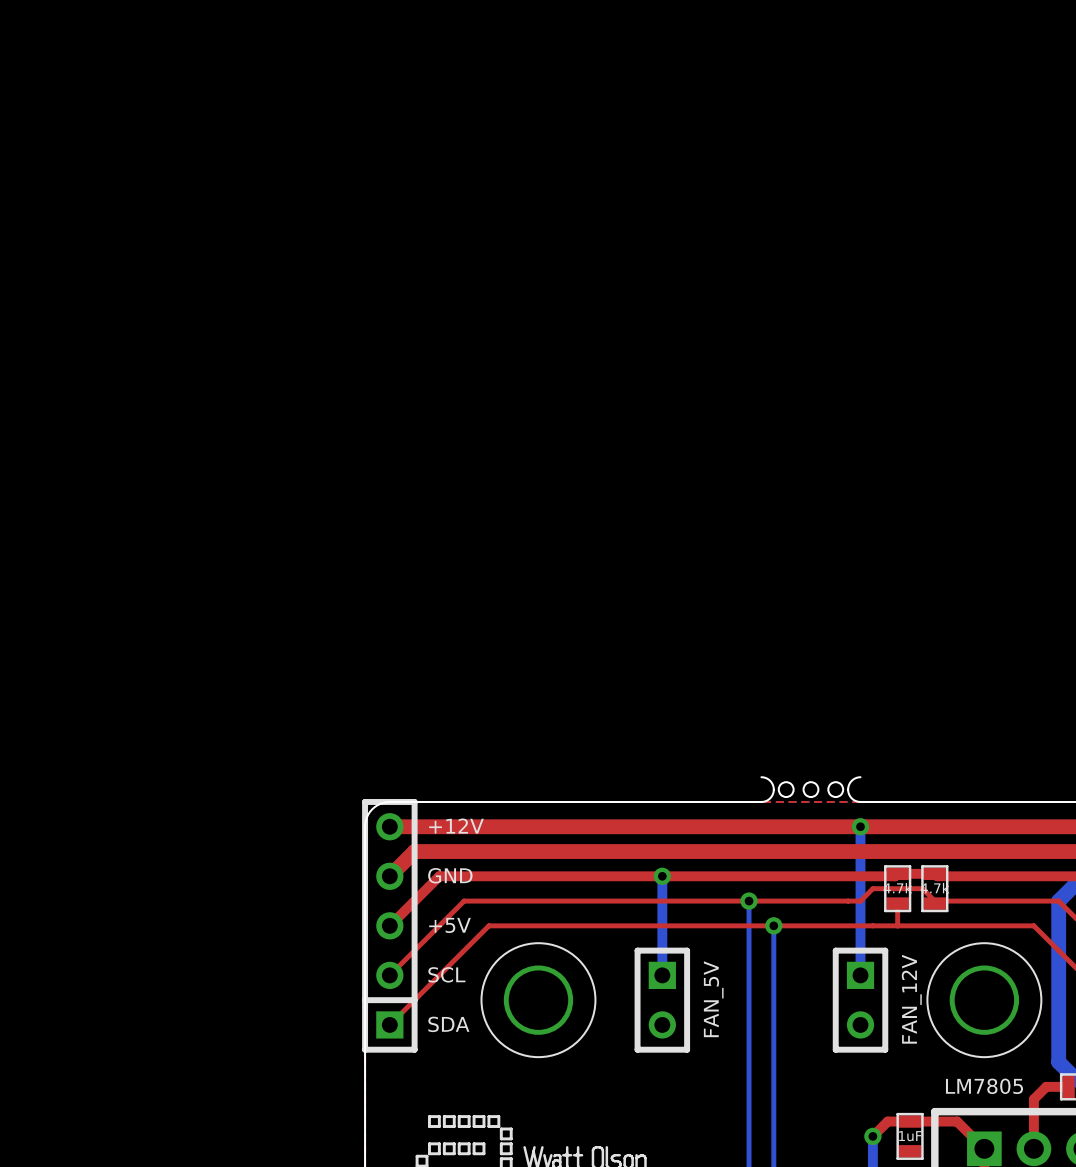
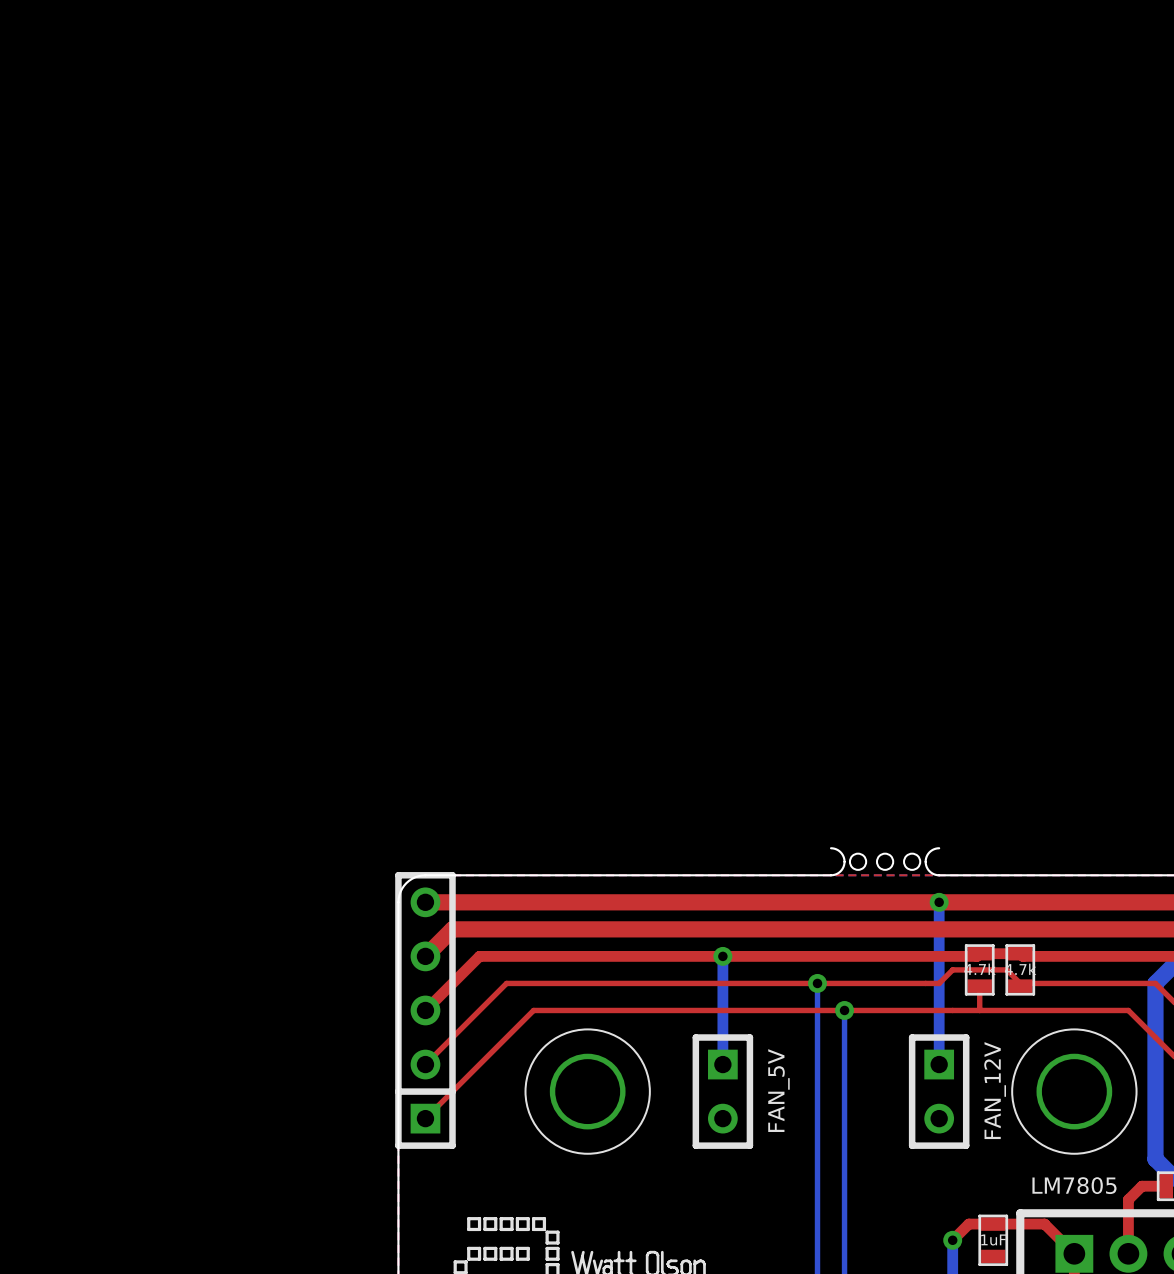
text: +12V (456, 826) -> none
text: GND (450, 875) -> none
text: +5V (449, 925) -> none
text: SCL (446, 974) -> none
text: SDA (448, 1024) -> none

